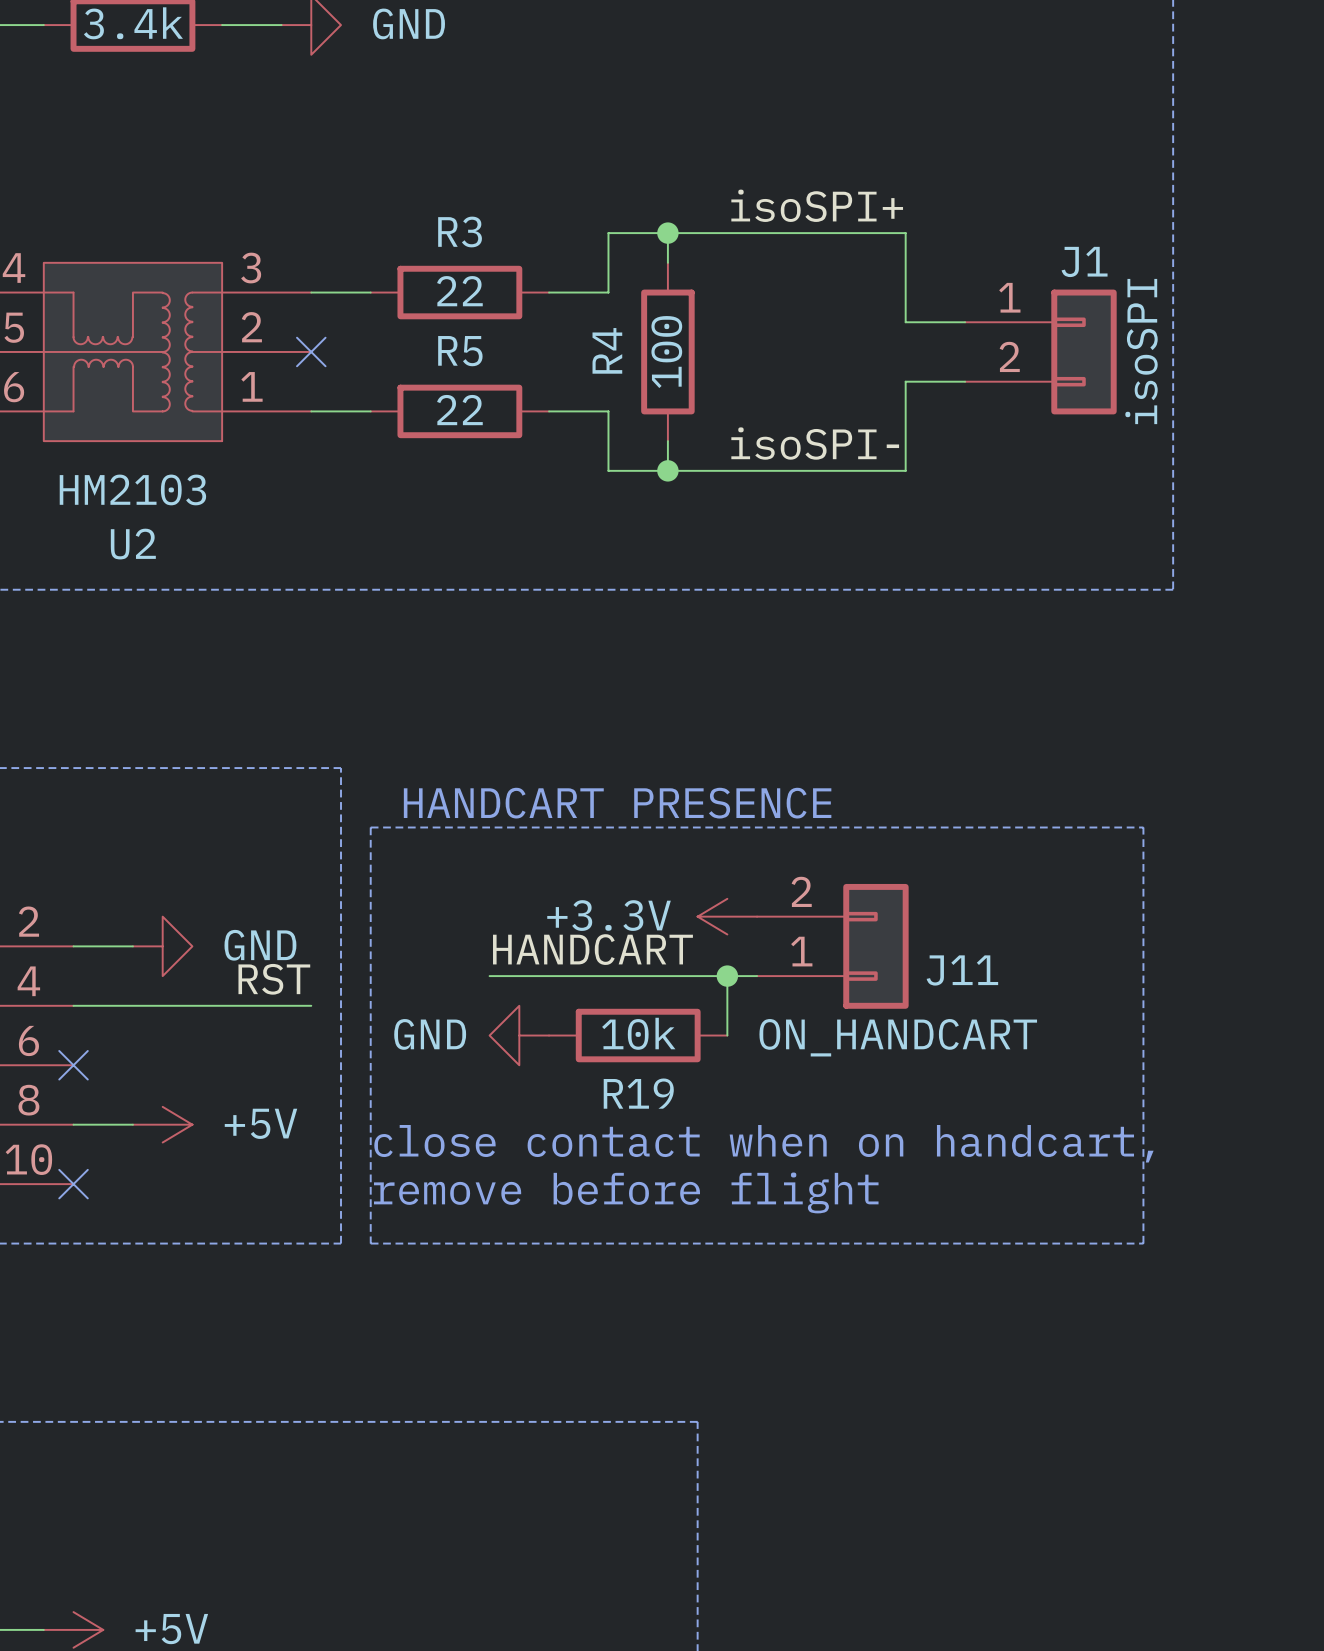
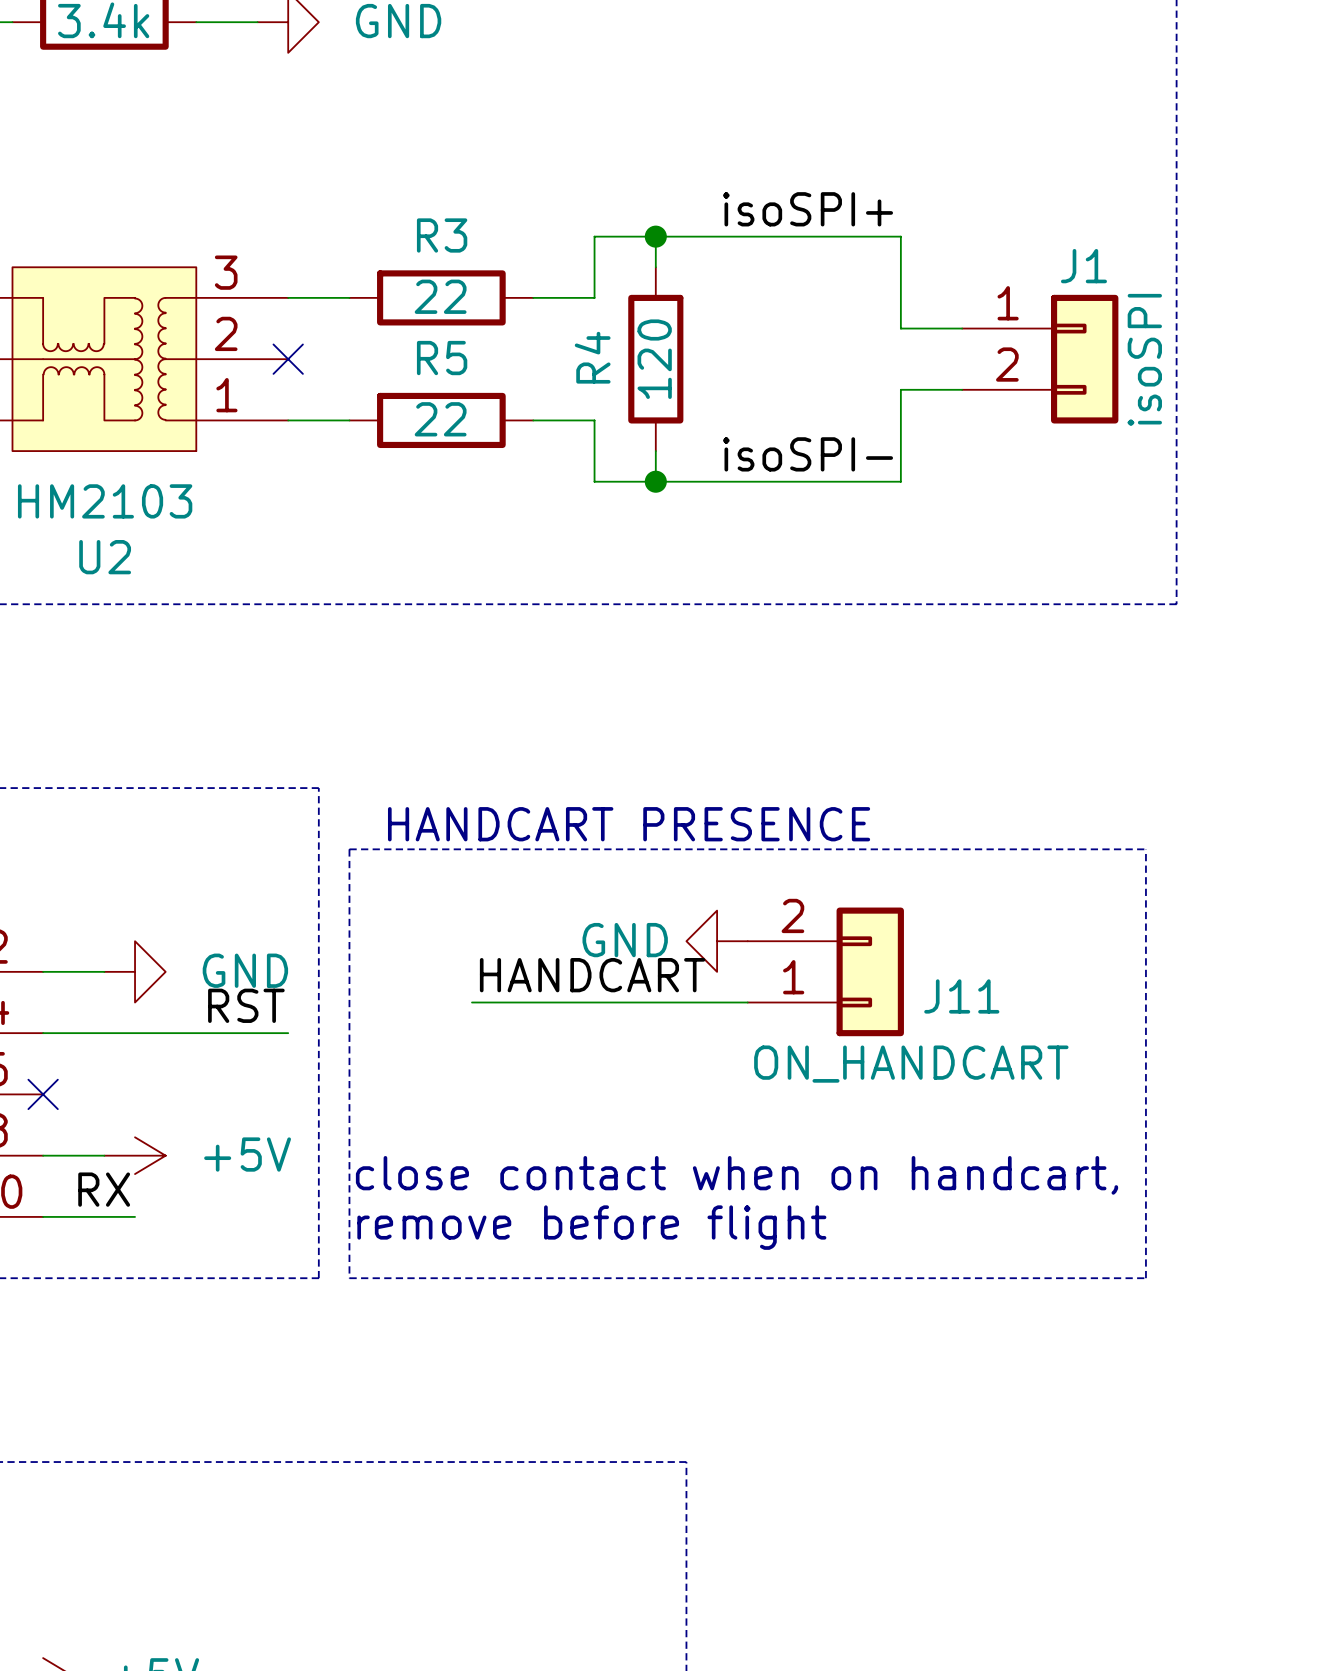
R4 value: 100 (666, 352) -> 120 (654, 359)
power symbol: +3.3V (727, 916) -> GND (717, 941)
wire: (727, 976) (727, 1035) -> none
junction: (727, 976) -> none
power symbol: GND (519, 1035) -> none
R19: 10k (638, 1035) -> none
label: none -> RX (104, 1189)
wire: none -> (43, 1216) (135, 1216)
no-connect mark: (73, 1184) -> none

